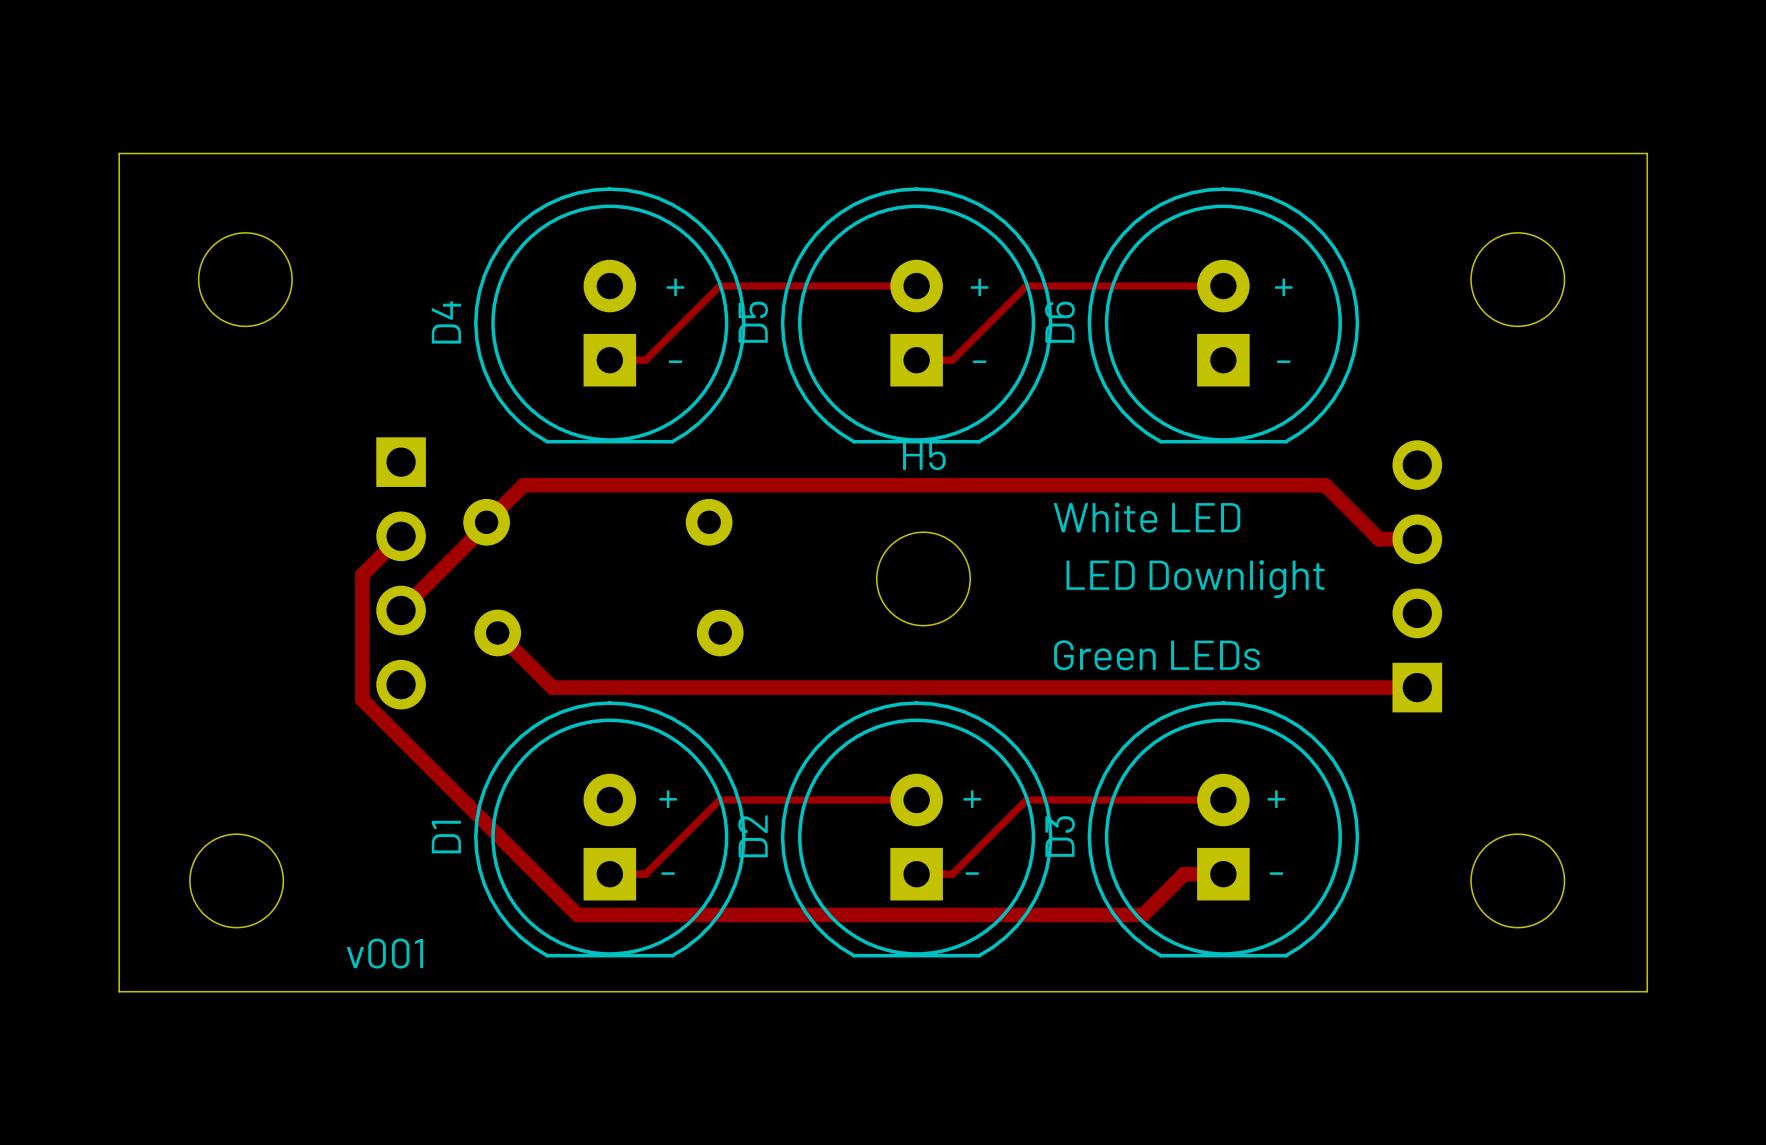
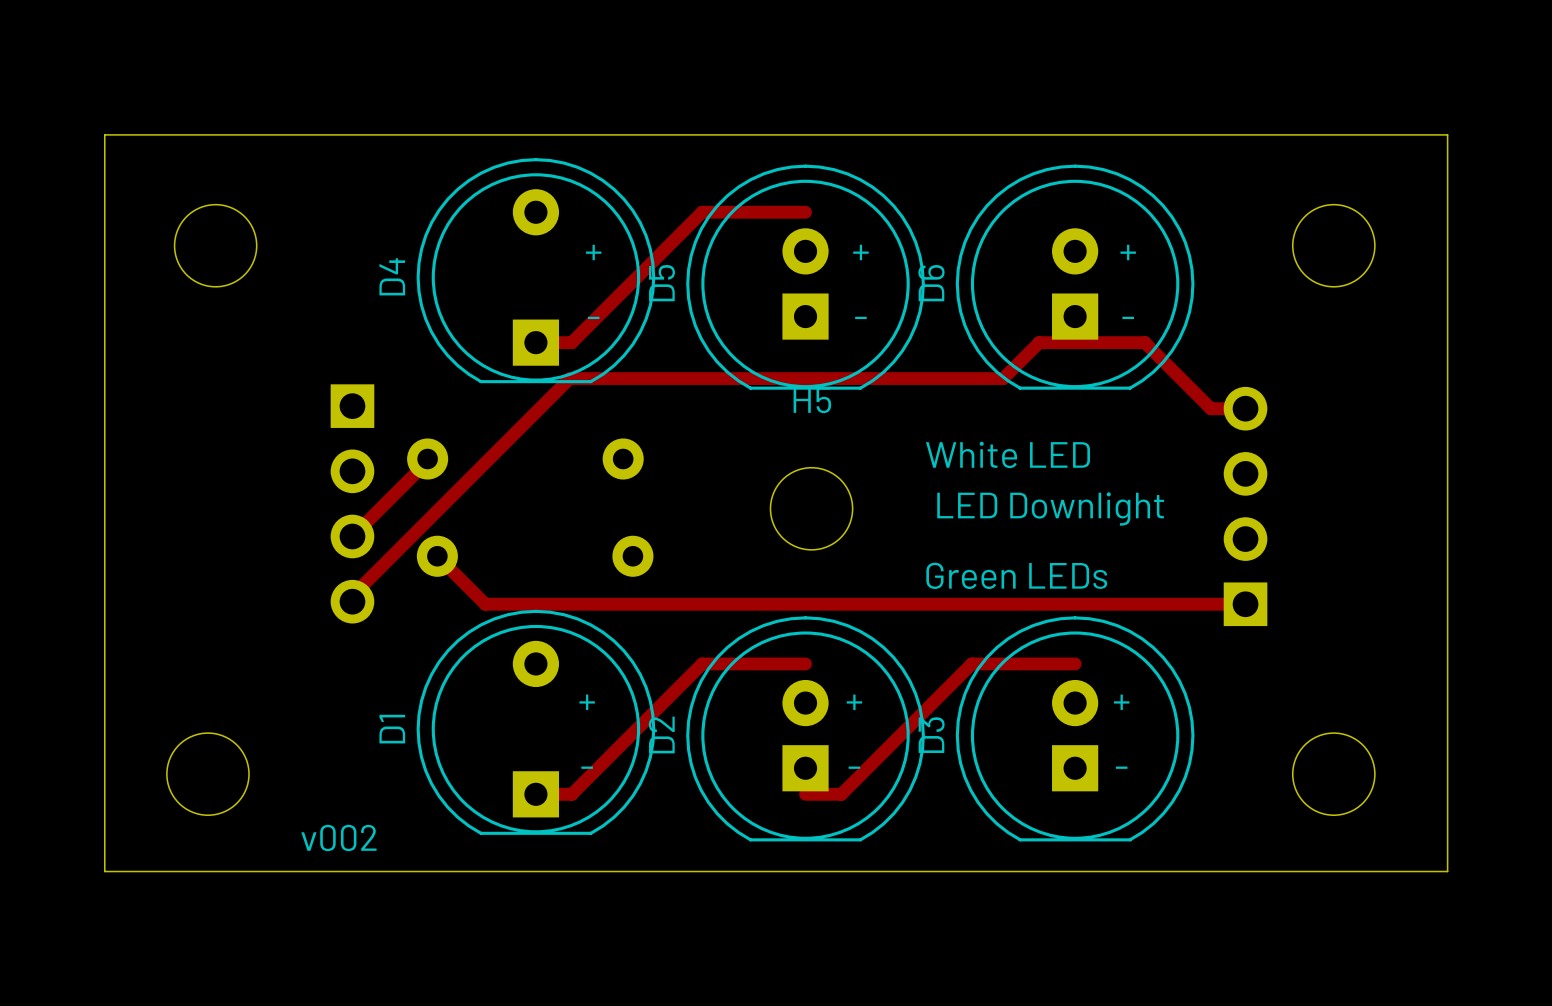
D4 footprint: [474, 187, 746, 444] -> [416, 158, 656, 384]
track: none -> (805, 212) (702, 212) (571, 342) (535, 342)
track: (916, 286) (719, 286) (645, 360) (609, 360) -> none
track: (1223, 286) (1026, 286) (952, 360) (916, 360) -> none
track: none -> (1245, 408) (1210, 408) (1144, 342) (1039, 342) (1003, 378) (569, 378) (352, 595) (352, 601)
track: (486, 522) (523, 485) (1325, 485) (1379, 539) (1417, 539) -> none
track: (401, 536) (362, 575) (362, 699) (577, 914) (1143, 914) (1183, 874) (1223, 874) -> none
D1 footprint: [474, 701, 746, 958] -> [416, 609, 656, 835]
track: none -> (805, 663) (702, 663) (571, 794) (535, 794)
track: none -> (1075, 663) (971, 663) (841, 794) (805, 794)
track: (916, 800) (719, 800) (645, 874) (609, 874) -> none
track: (1223, 800) (1026, 800) (952, 874) (916, 874) -> none
text: v001 (384, 953) -> v002 (338, 837)

